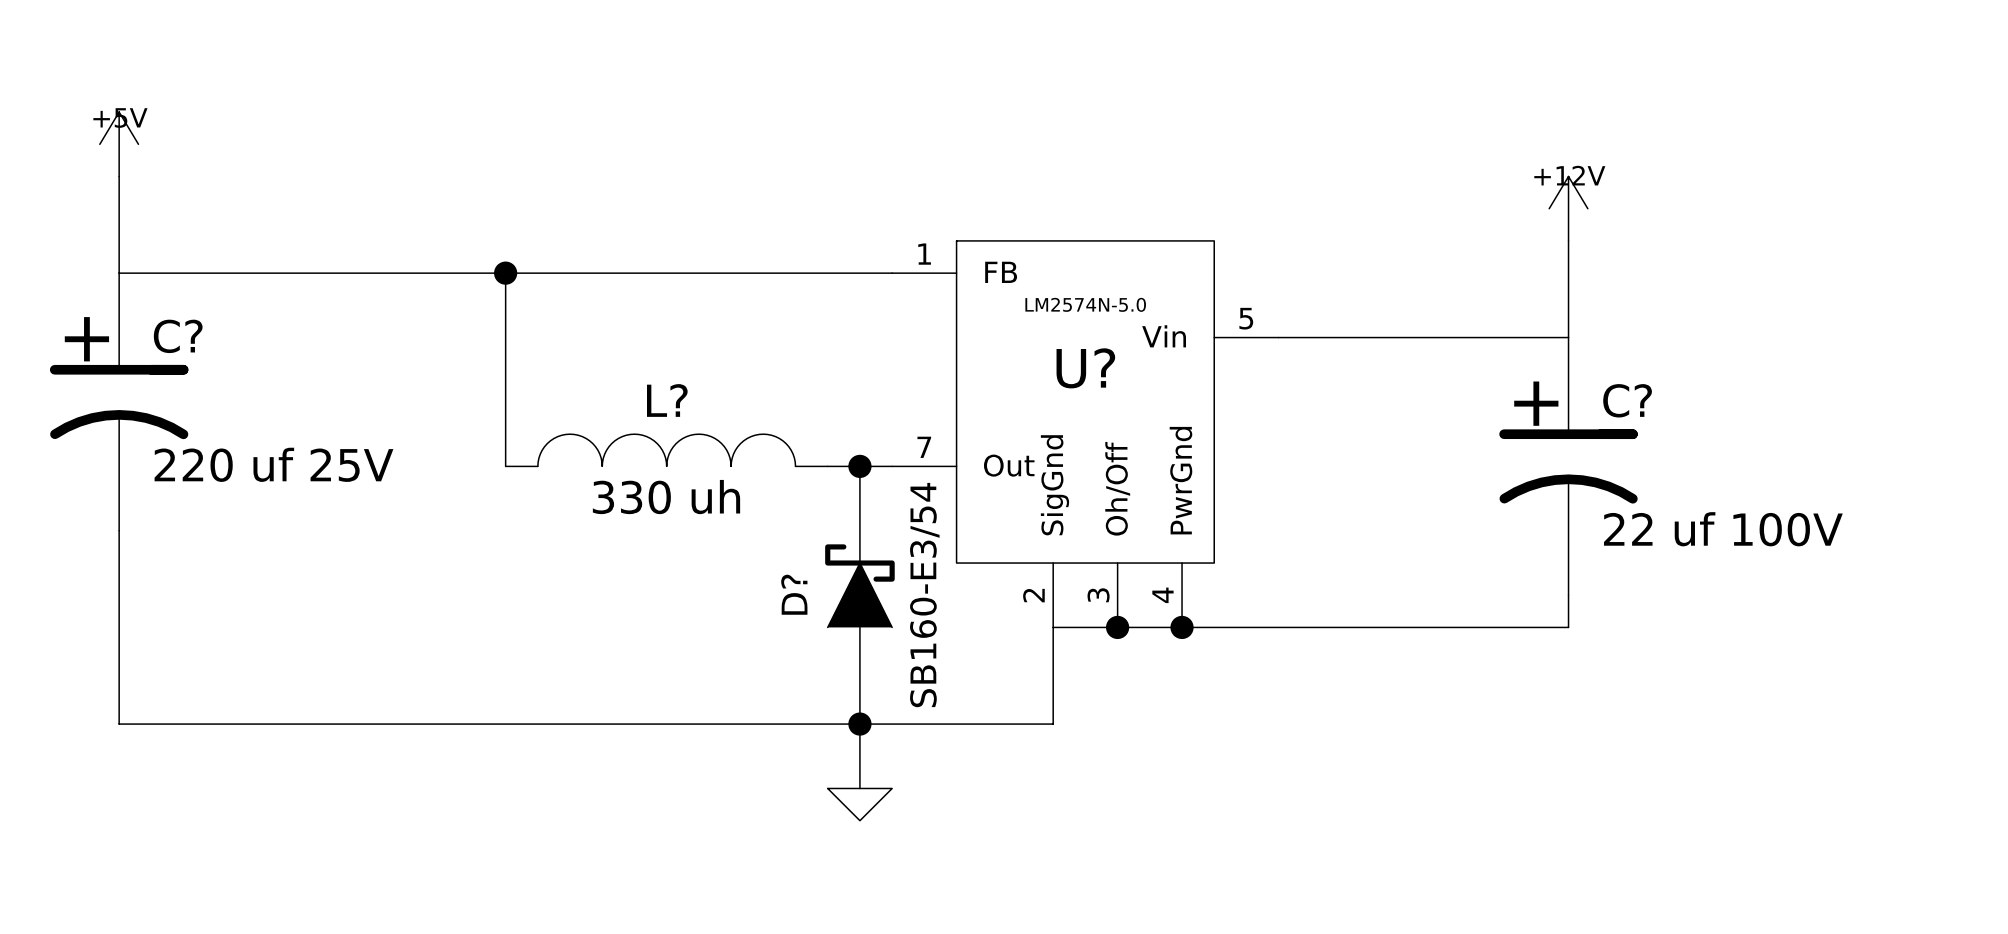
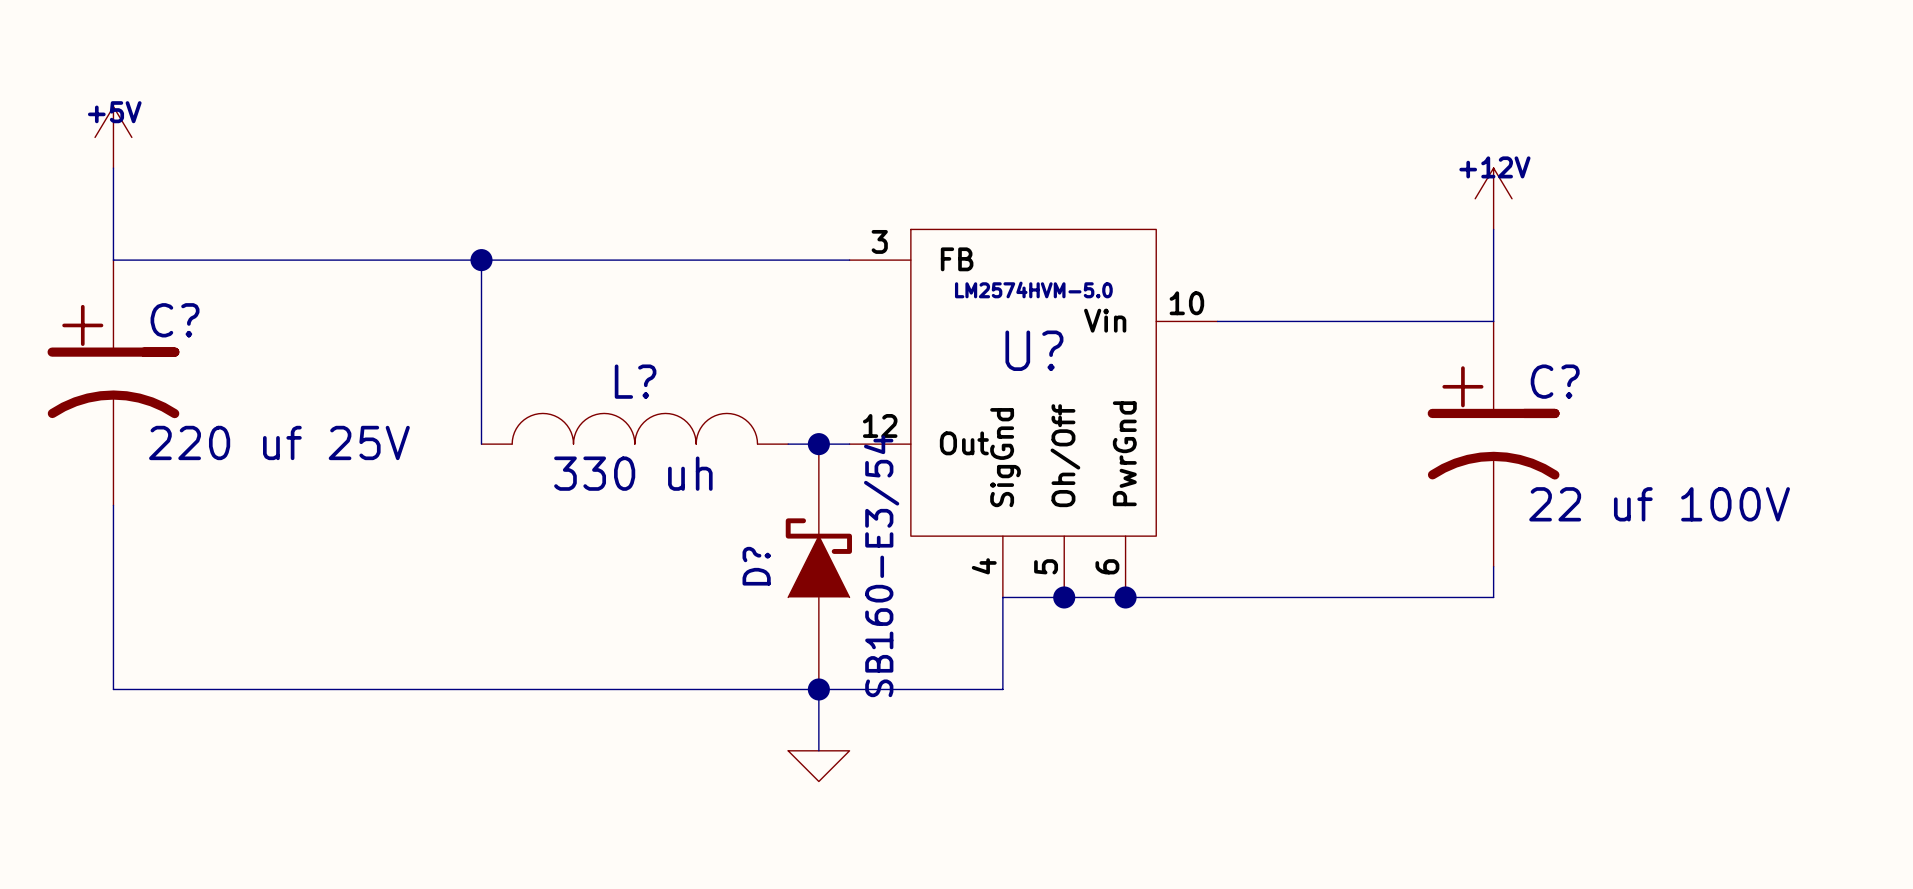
U? pin number: 1 (924, 254) -> 3 (879, 241)
U? value: LM2574N-5.0 (1085, 304) -> LM2574HVM-5.0 (1033, 289)
U? pin number: 5 (1246, 318) -> 10 (1186, 303)
U? pin number: 7 (924, 447) -> 12 (880, 425)
U? pin number: 2 (1033, 595) -> 4 (984, 566)
U? pin number: 3 (1098, 595) -> 5 (1046, 566)
U? pin number: 4 (1162, 595) -> 6 (1107, 566)

